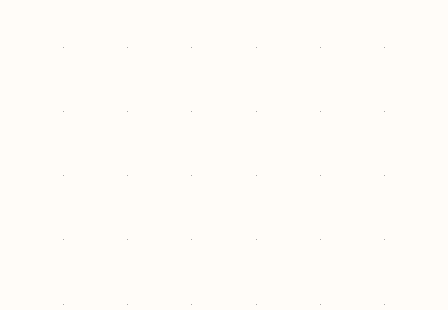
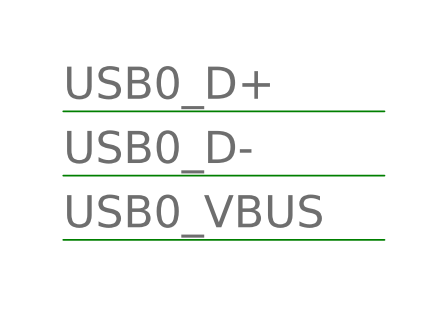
label: none -> USB0_D+ (168, 87)
wire: none -> (63, 111) (384, 111)
label: none -> USB0_D- (159, 151)
wire: none -> (63, 175) (384, 175)
label: none -> USB0_VBUS (194, 216)
wire: none -> (63, 239) (384, 239)

